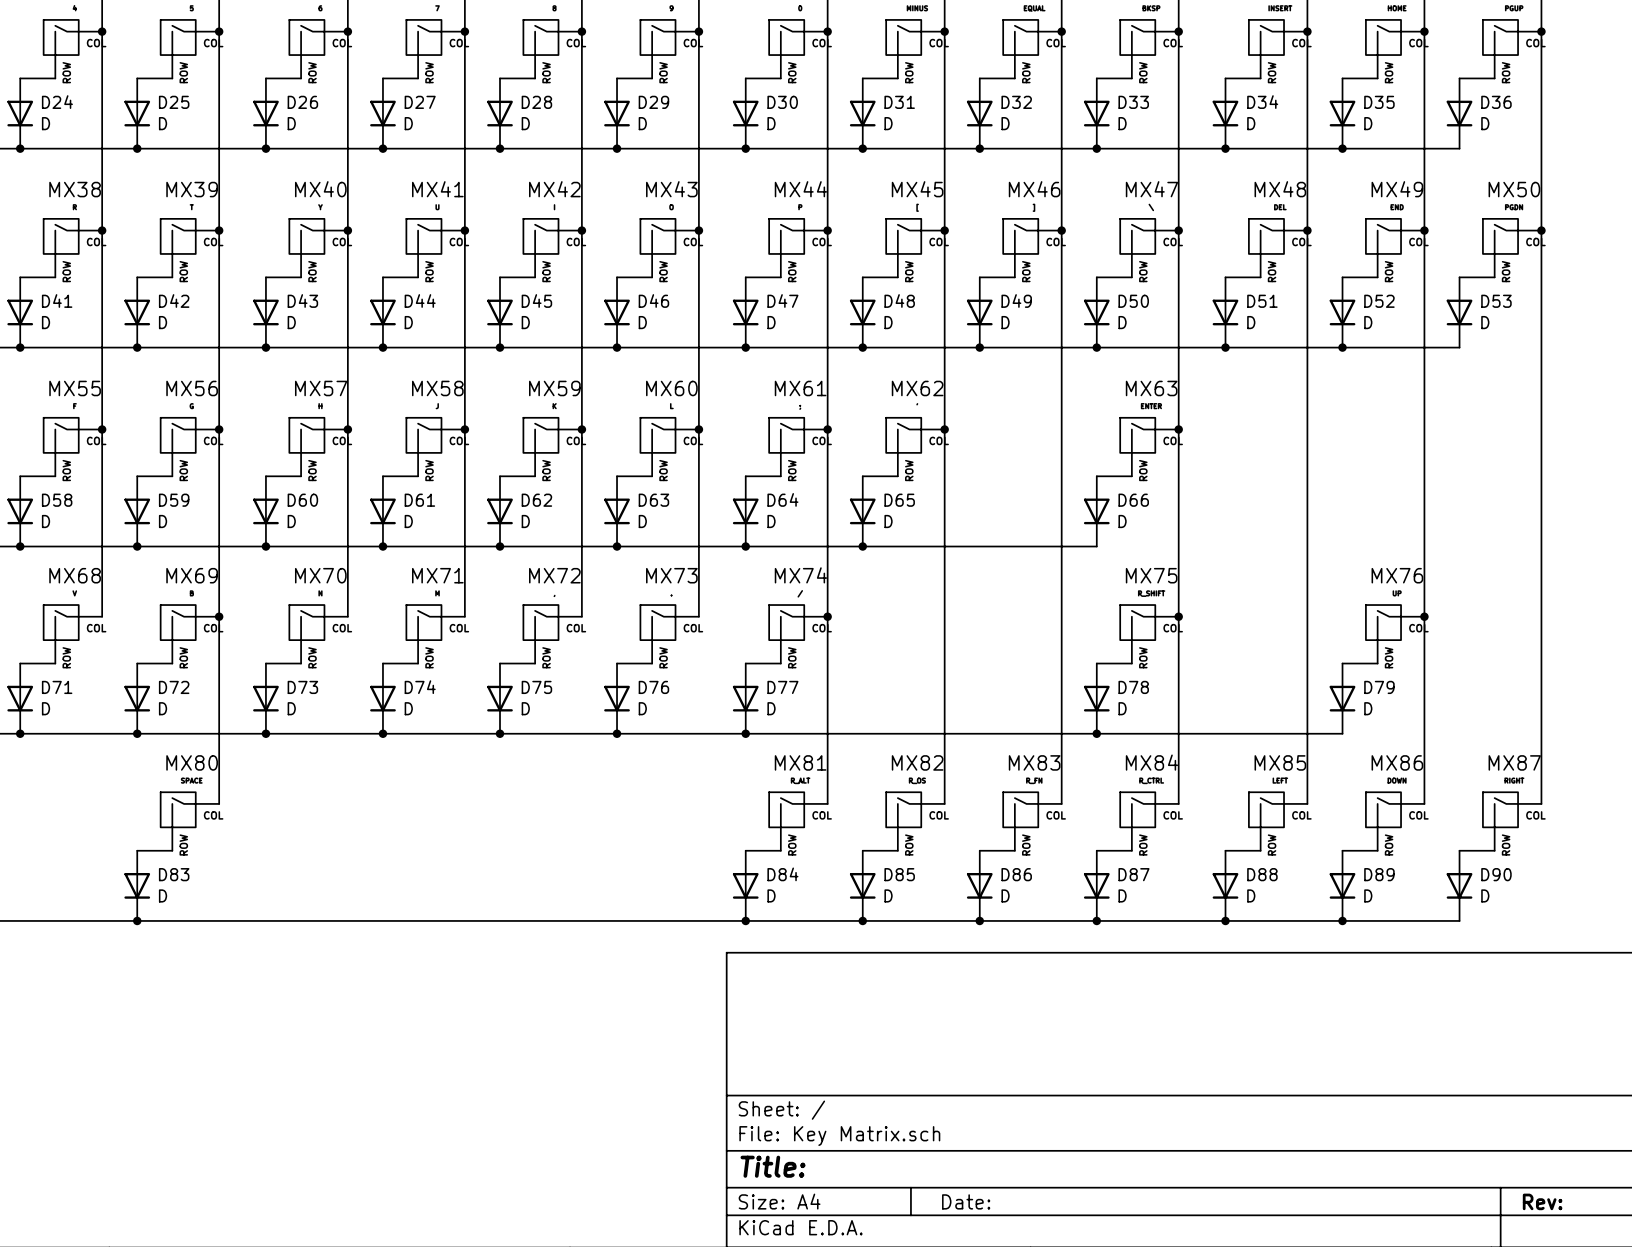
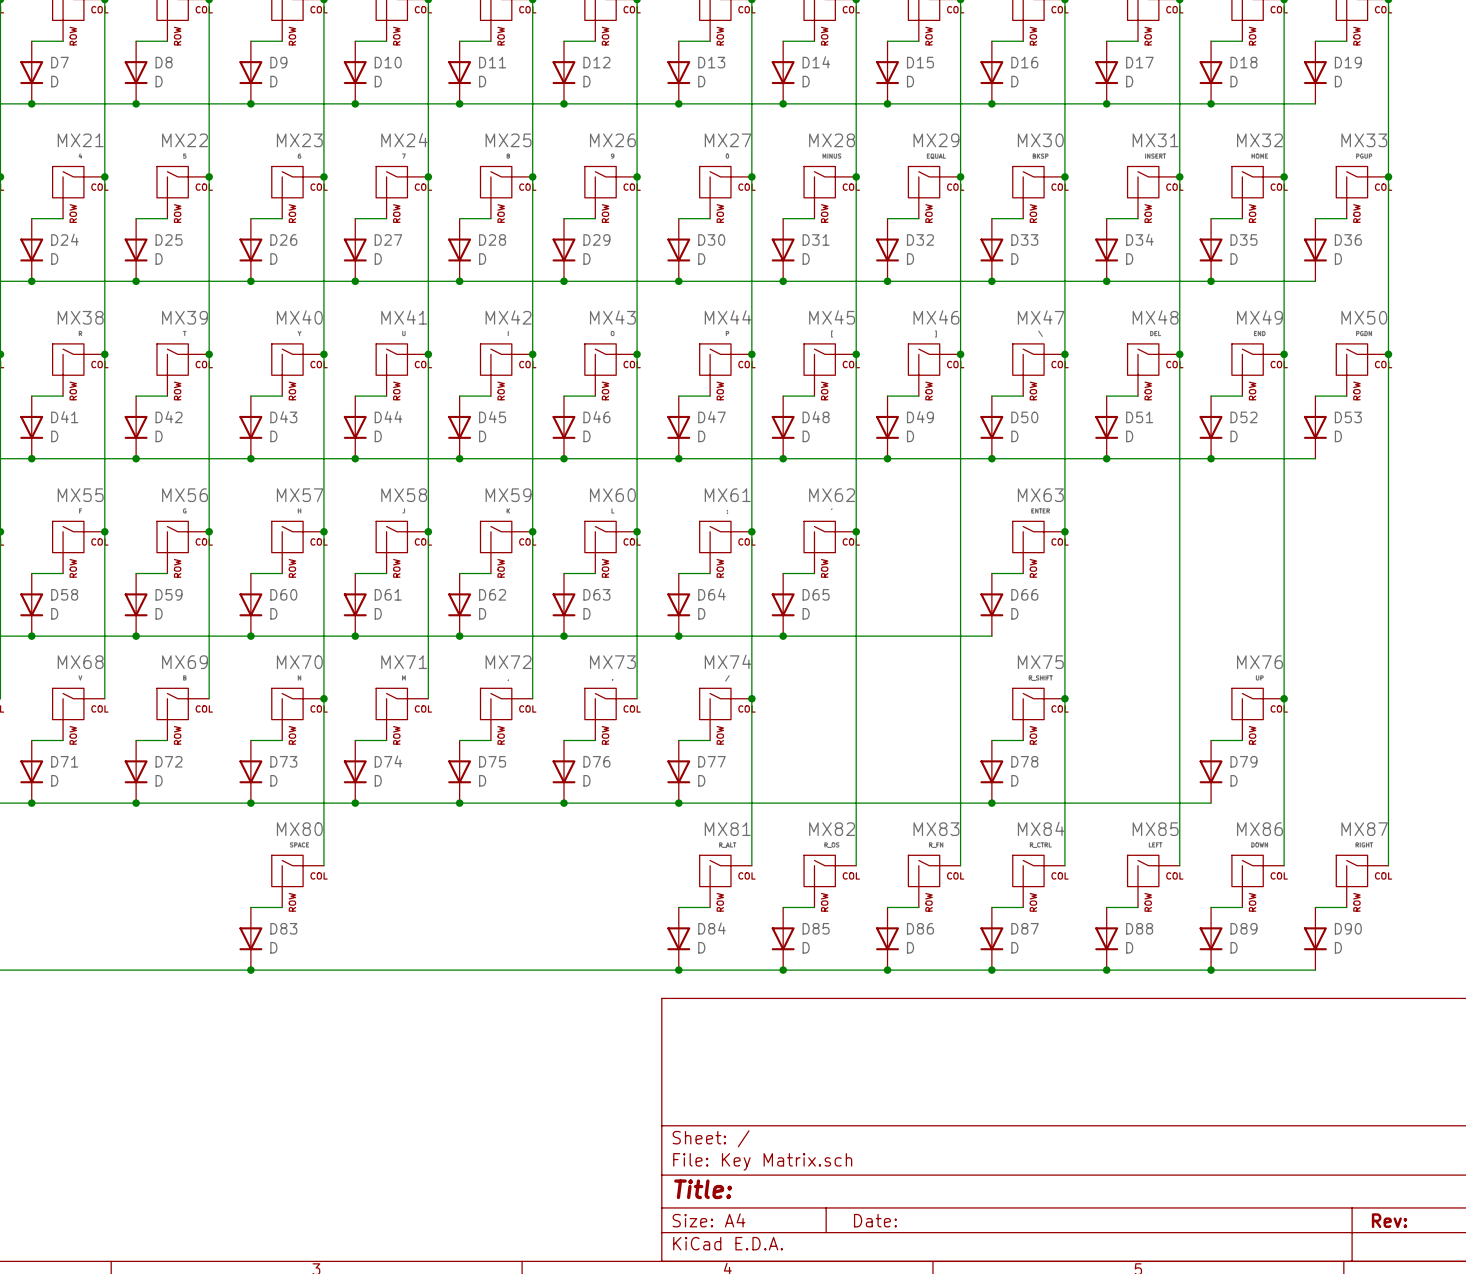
wire: (219, 616) (219, 803) -> (323, 698) (323, 865)
junction: (219, 616) -> none
junction: none -> (323, 698)
MX80 position: (189, 821) -> (297, 881)
wire: (137, 850) (172, 850) -> (250, 907) (282, 907)
D83 position: (137, 885) -> (250, 938)
junction: (137, 920) -> none
junction: none -> (250, 970)

